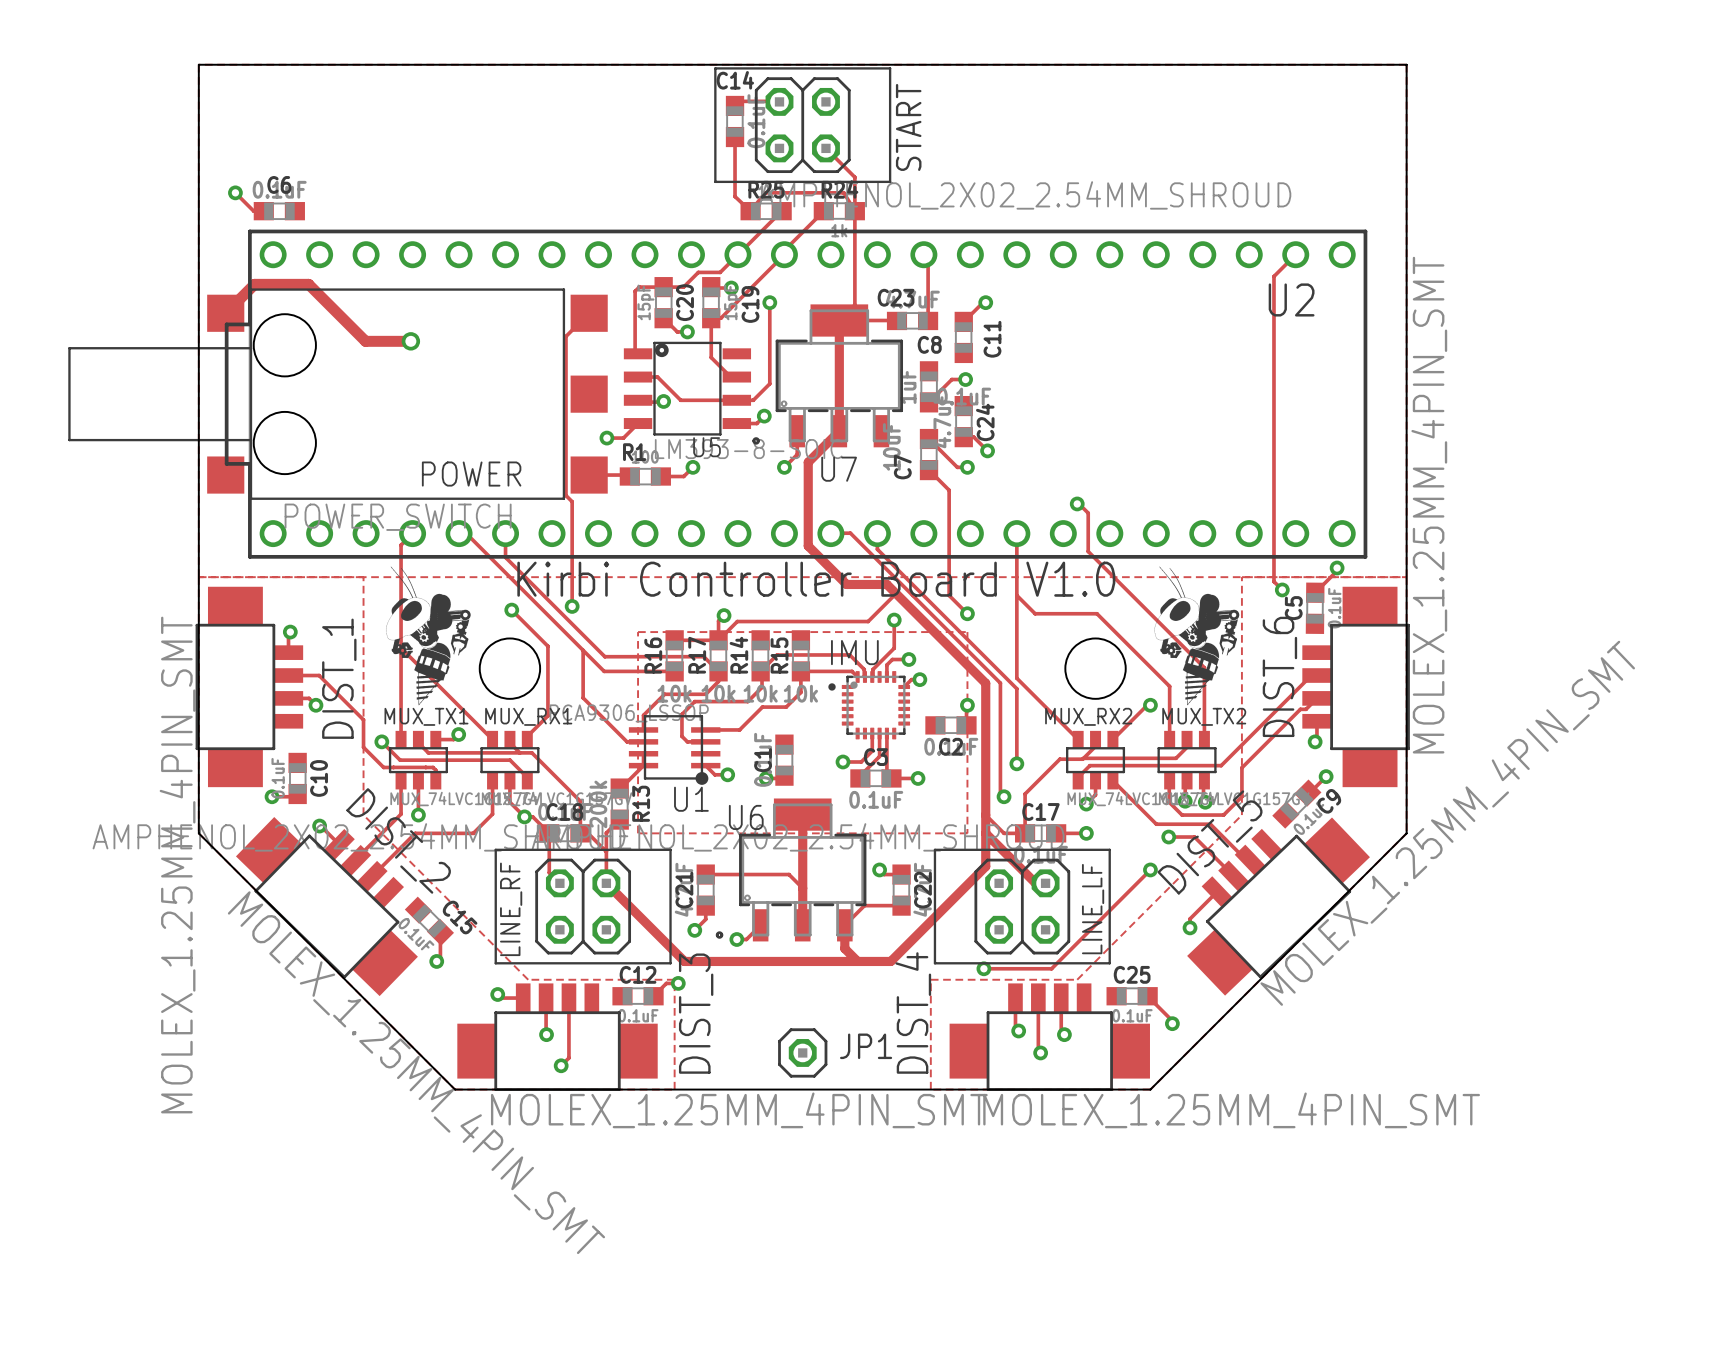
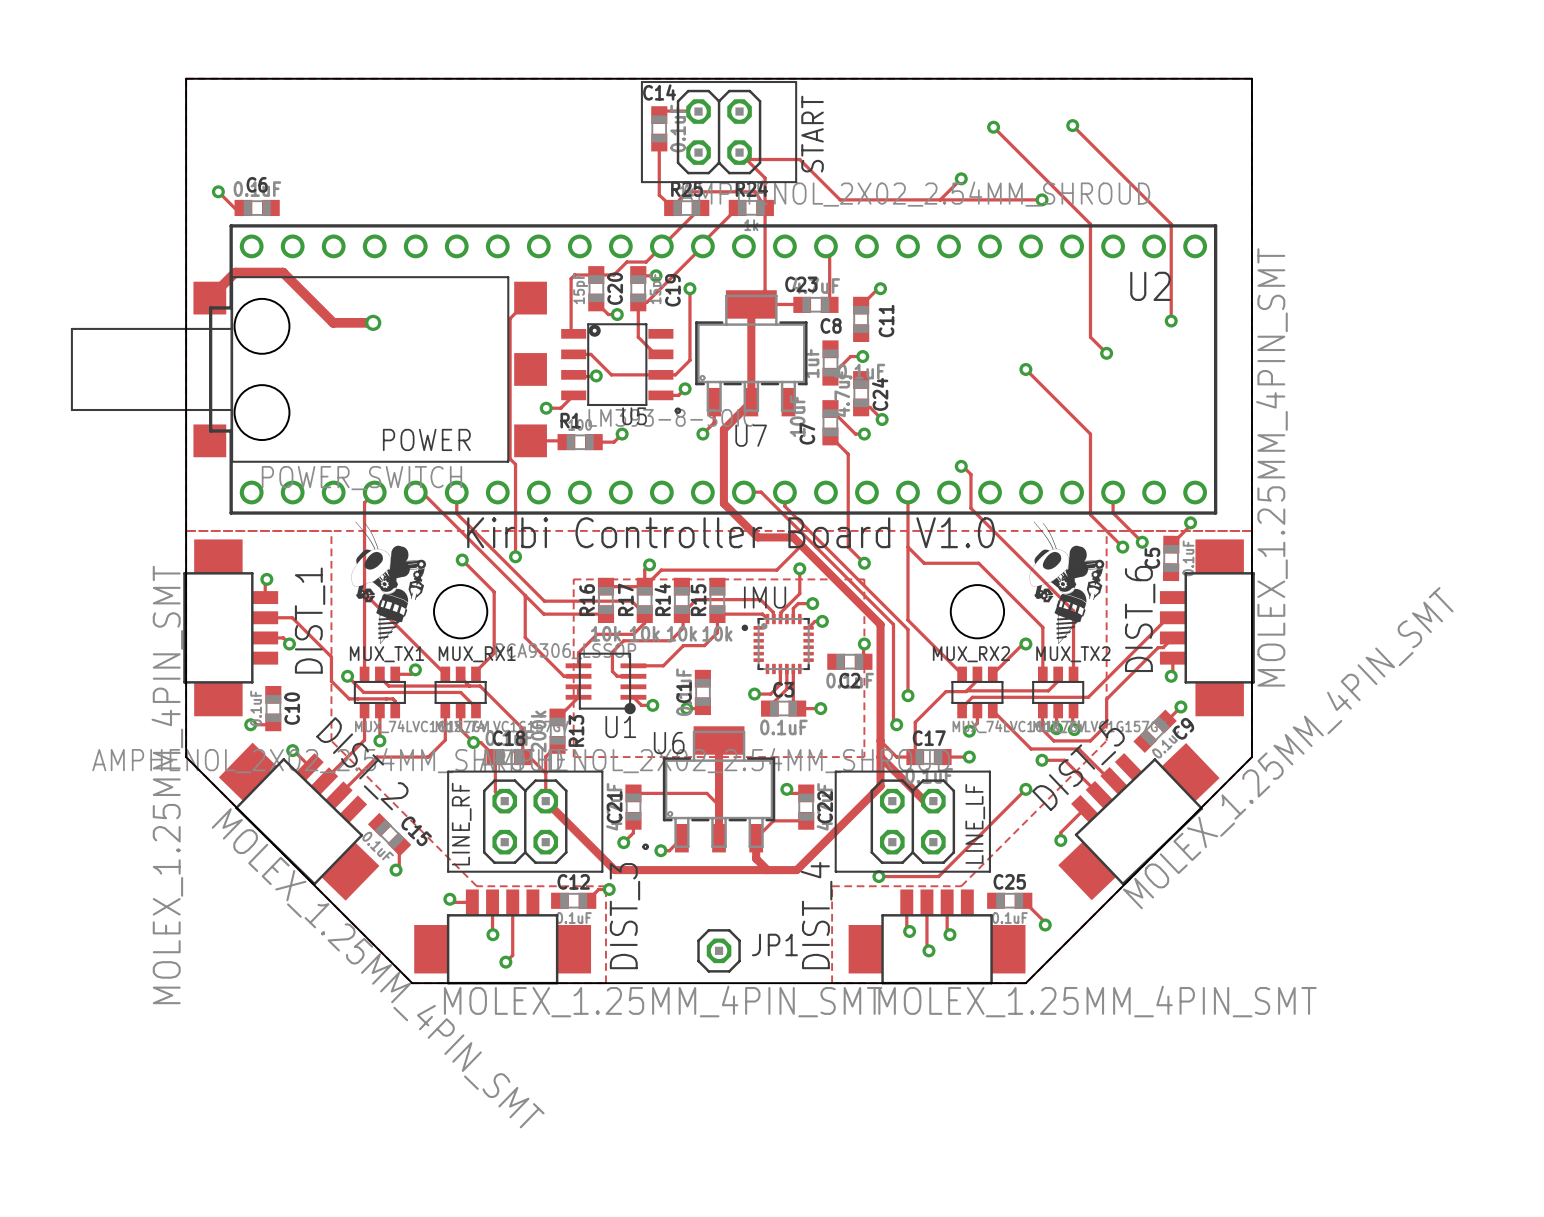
track: none -> (1072, 125) (1171, 224) (1171, 321)
via: none -> (1072, 125)
track: none -> (993, 127) (1090, 224) (1090, 337) (1106, 353)
via: none -> (993, 127)
track: none -> (746, 159) (799, 159) (840, 199) (1042, 199)
track: none -> (961, 178) (940, 199)
via: none -> (961, 178)
via: none -> (1042, 199)
track: (1295, 254) (1273, 276) (1273, 581) -> (1113, 492) (1113, 513) (1134, 534)
via: none -> (1171, 321)
via: none -> (1106, 353)
track: none -> (1025, 369) (1090, 434) (1090, 514) (1122, 547)
via: none -> (1025, 369)
via: none -> (1122, 547)

